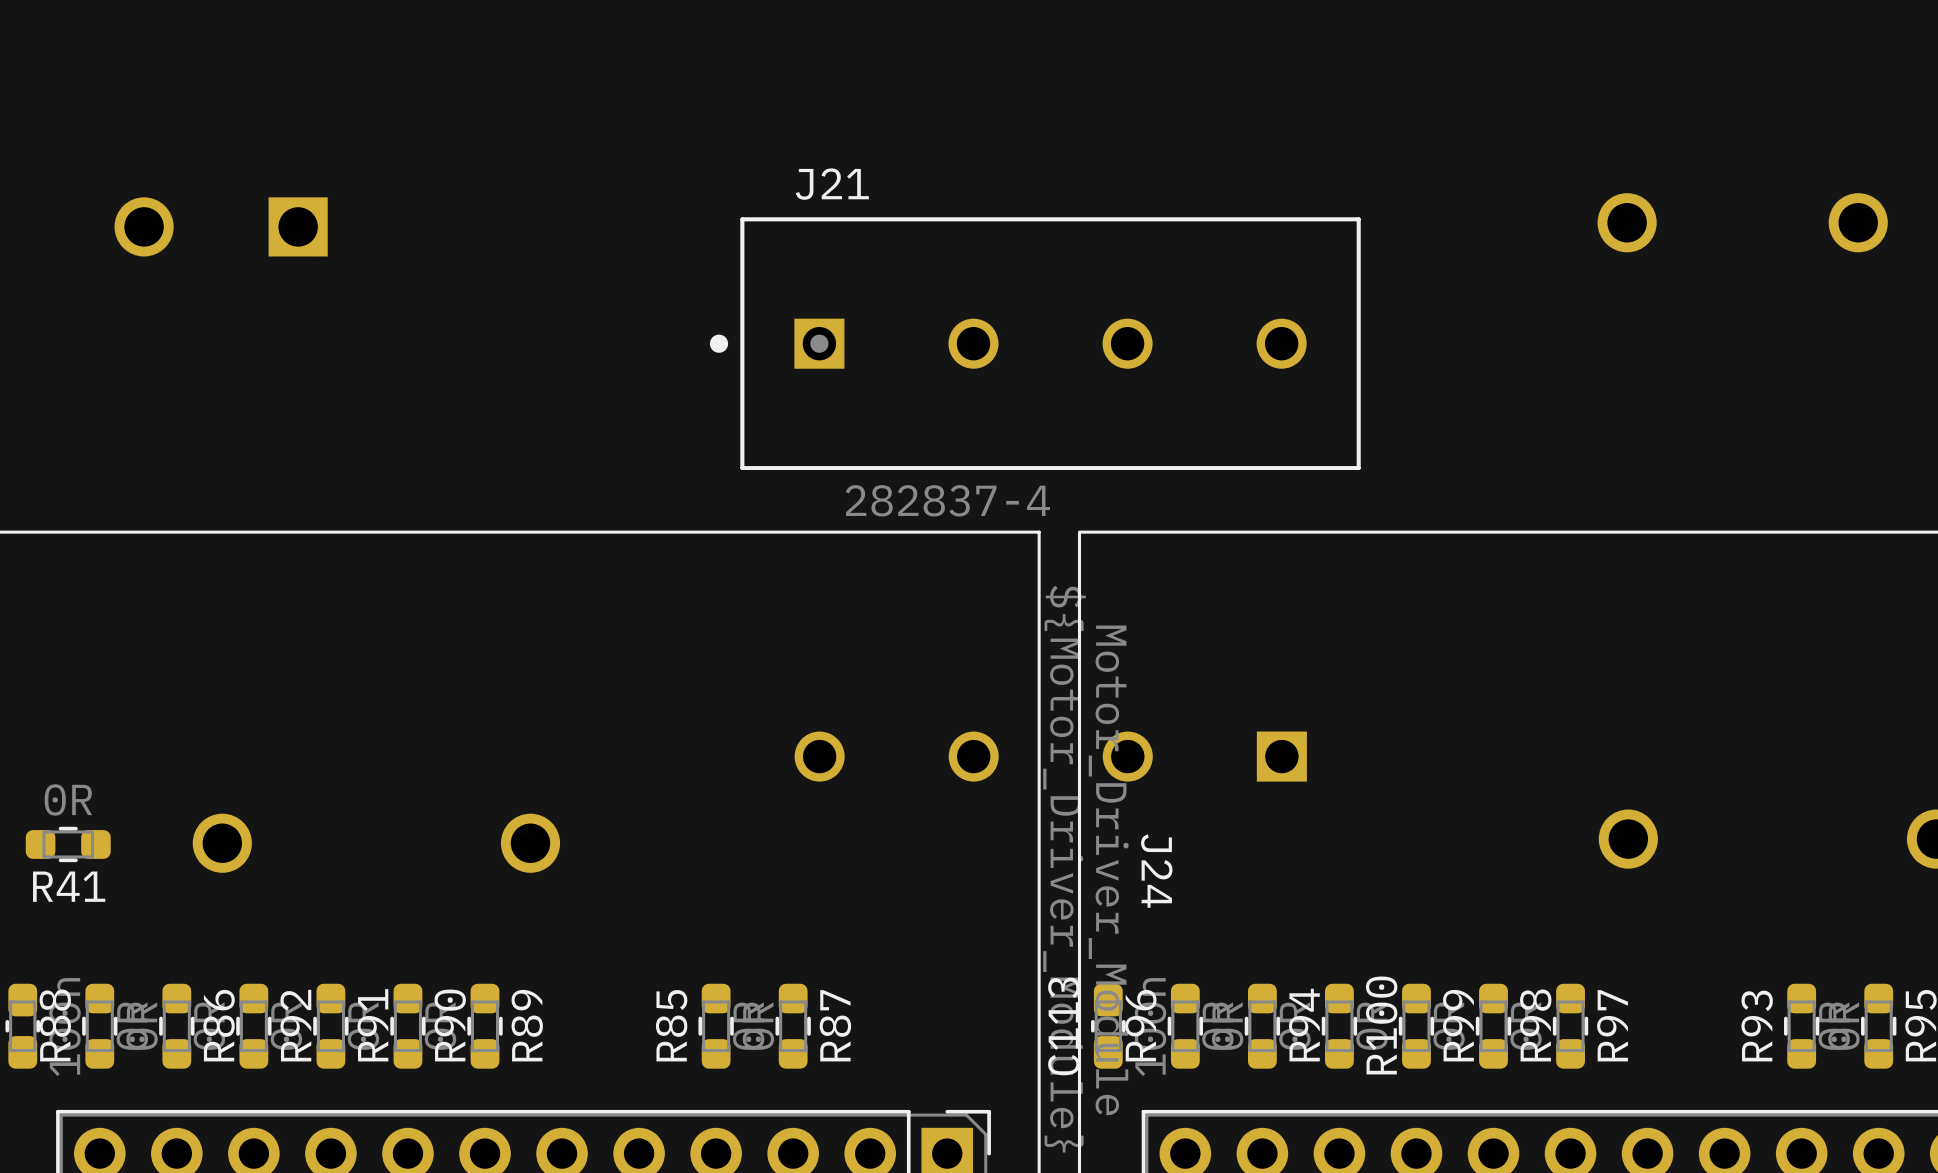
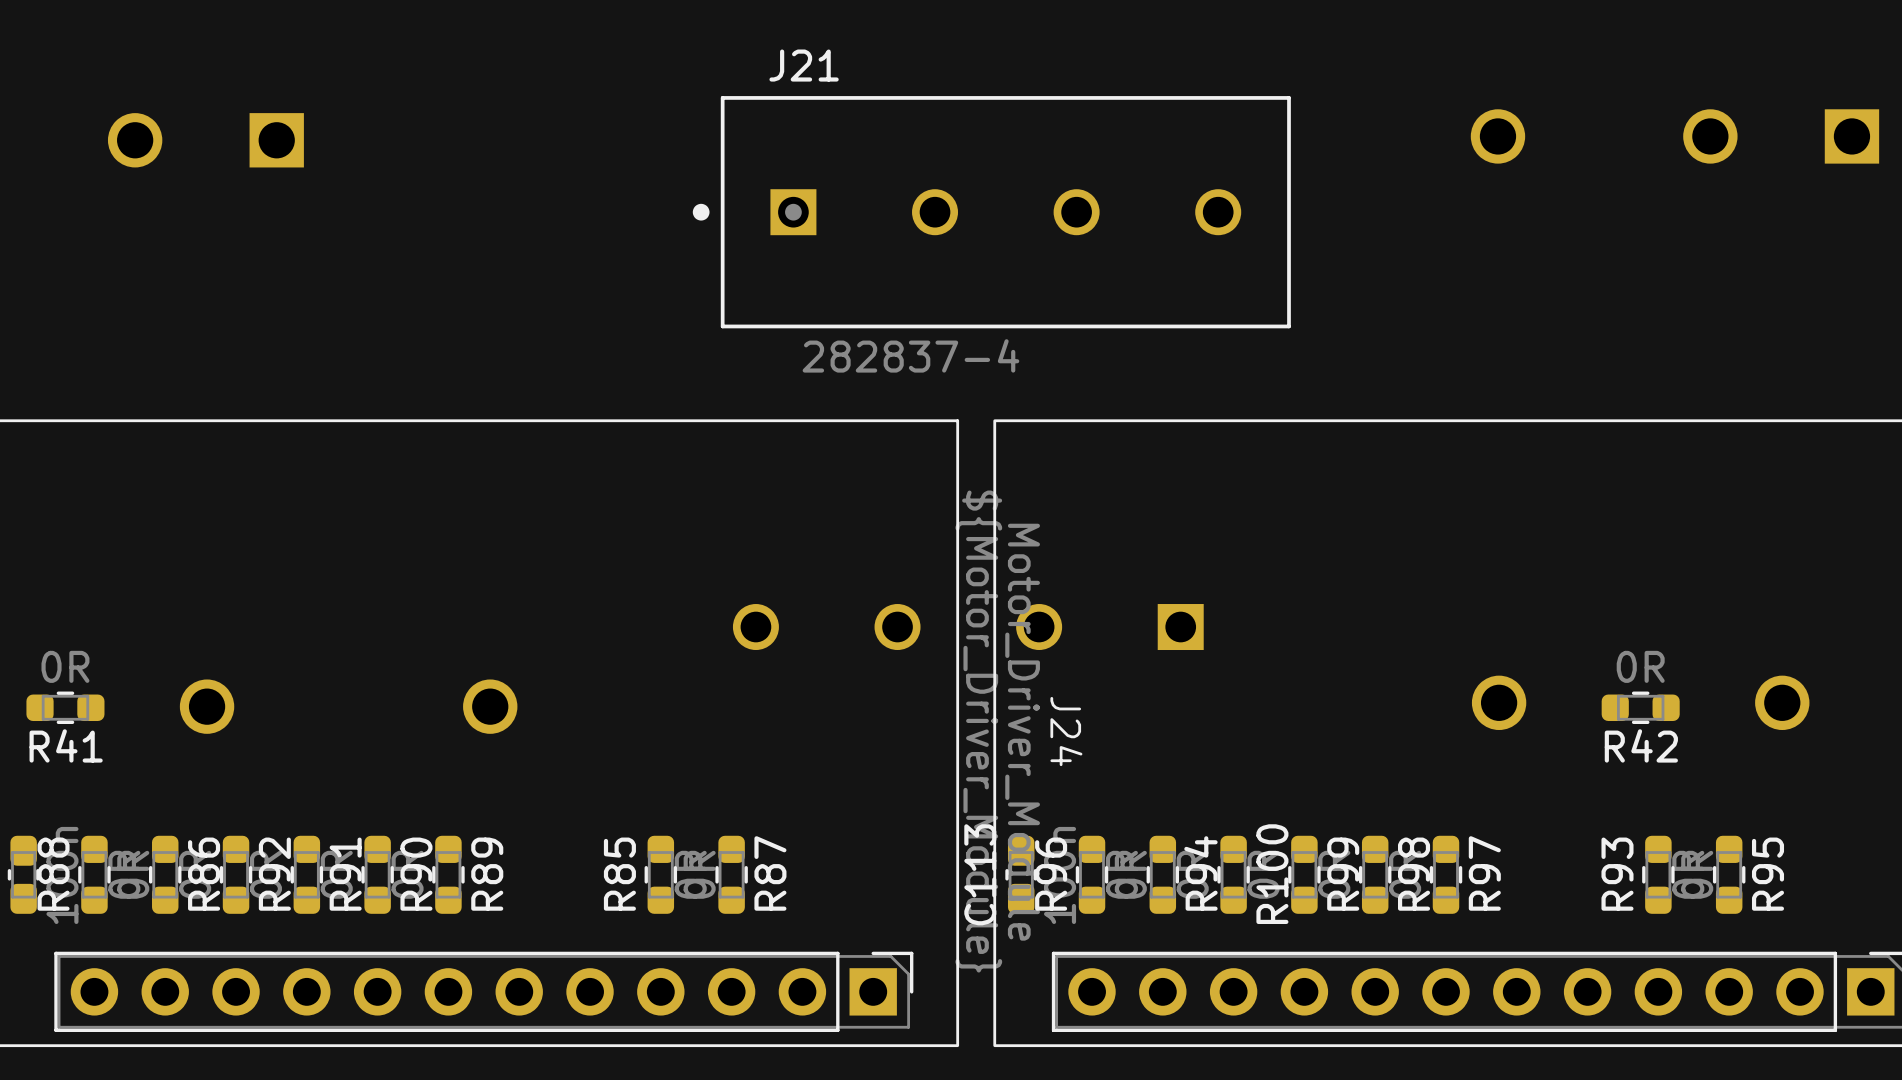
J21 position: (1035, 343) -> (991, 212)
R42: none -> 0R (1640, 707)

